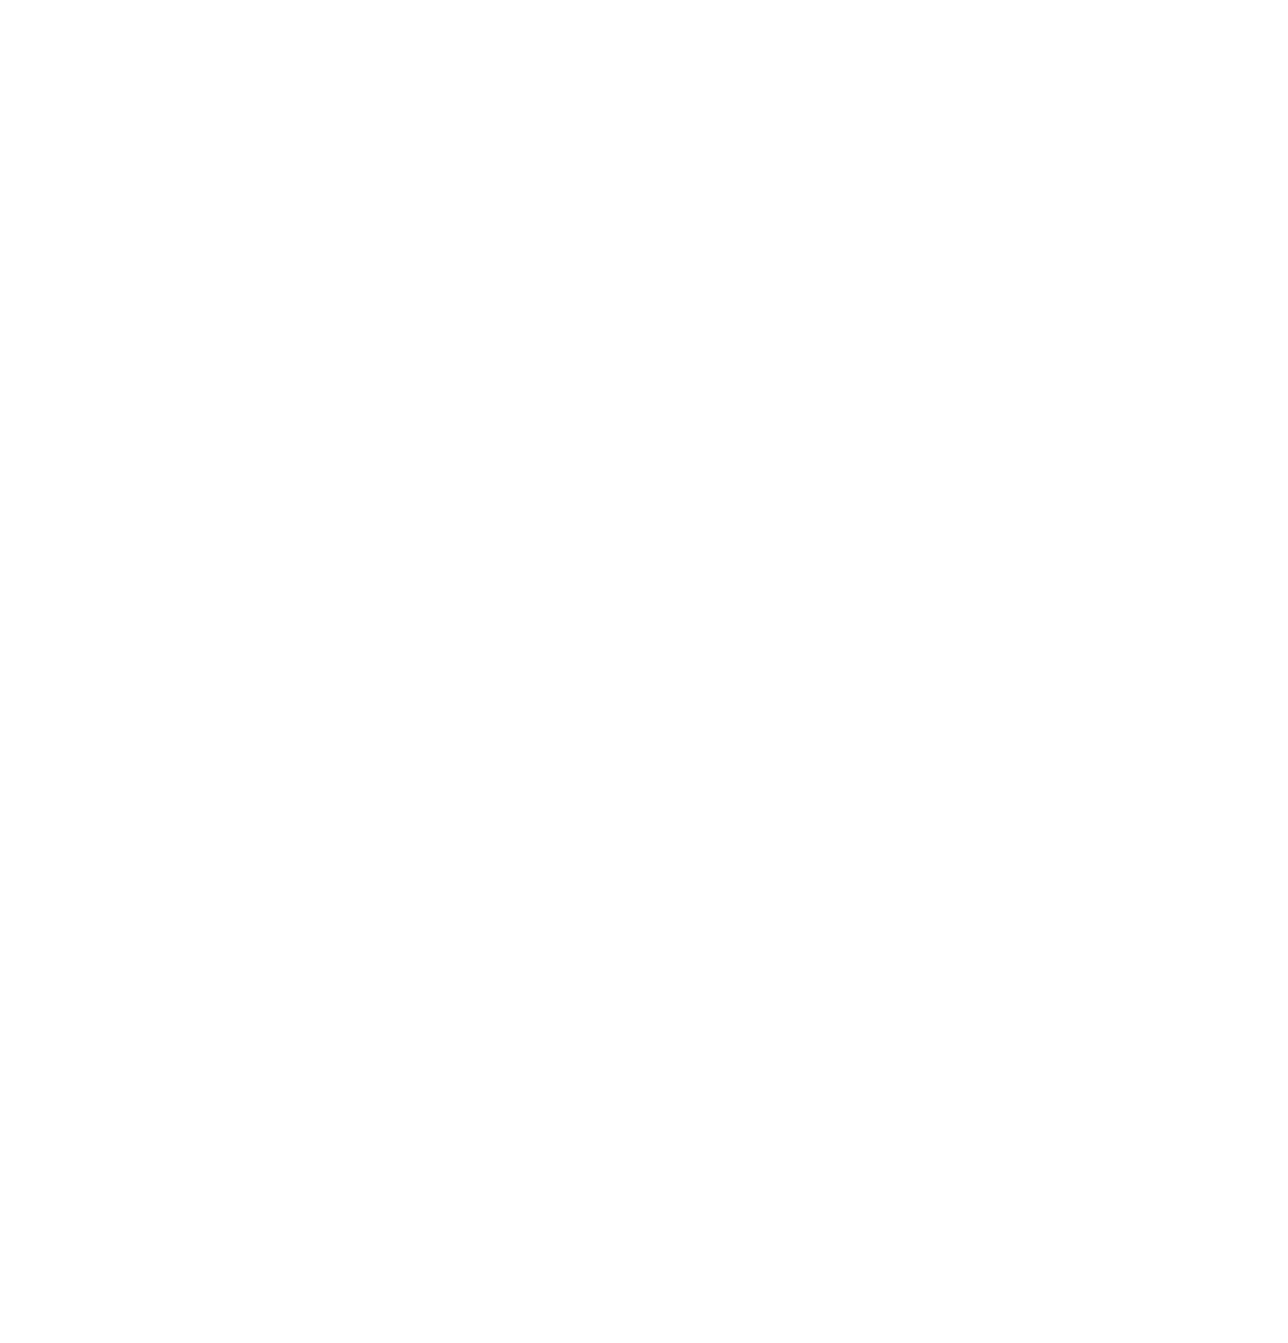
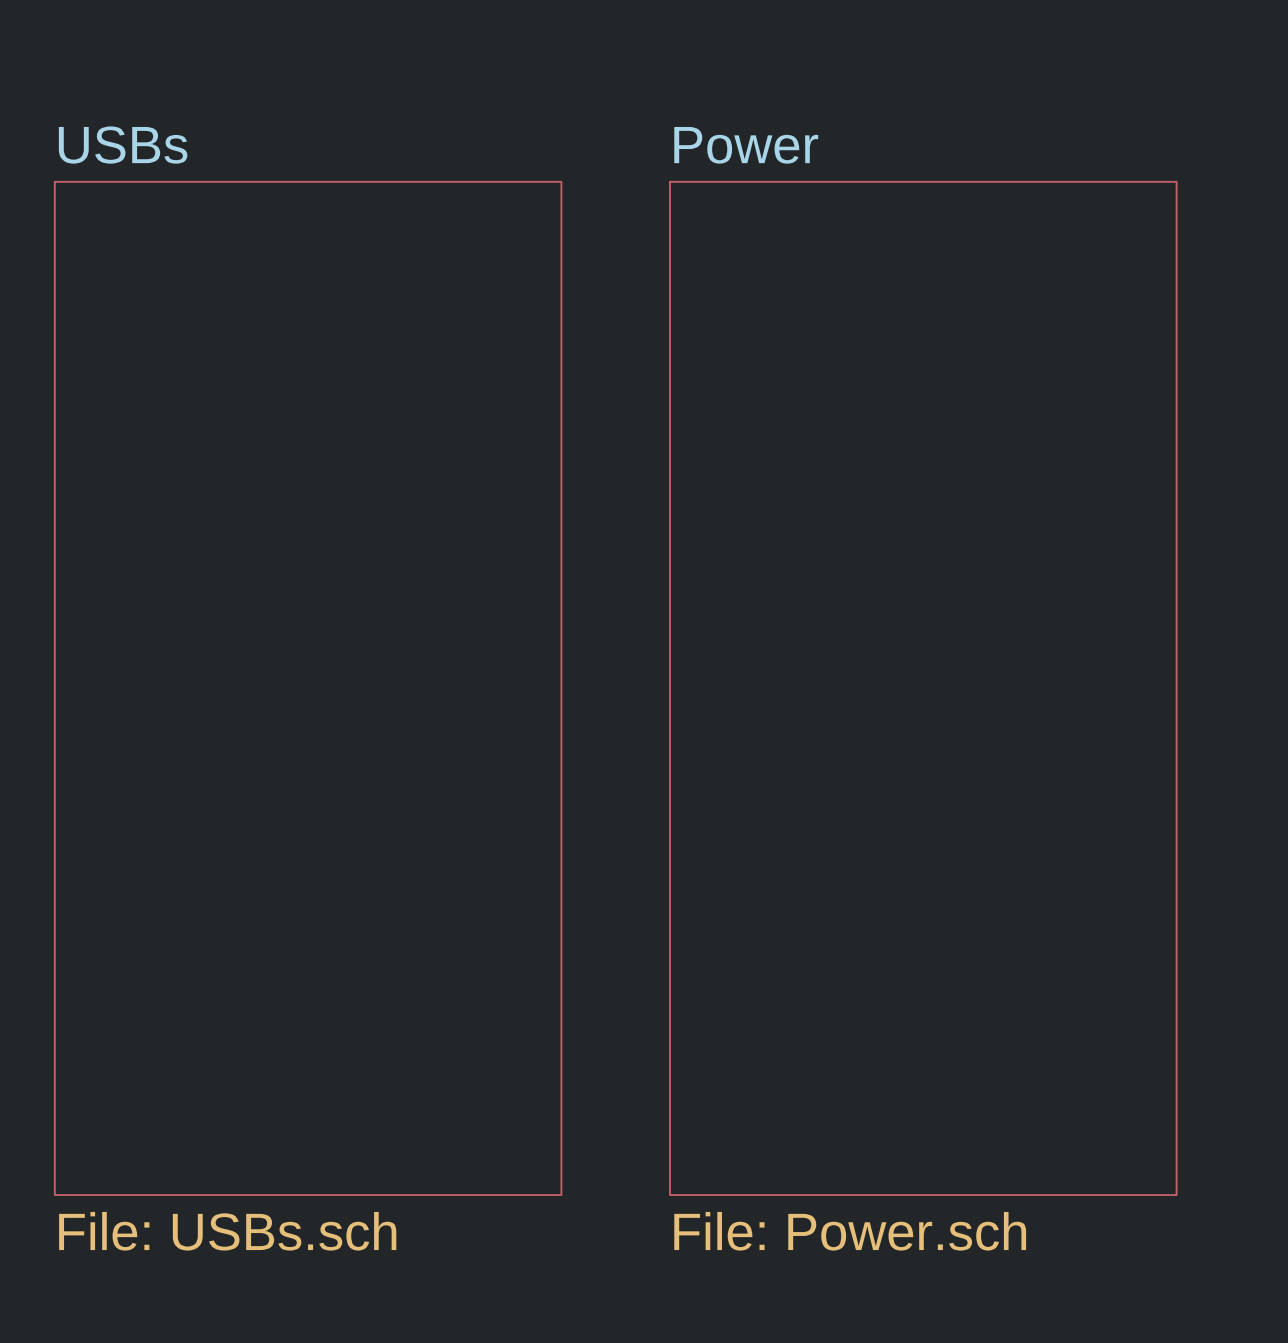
sheet USBs: none -> File: USBs.sch (308, 688)
sheet Power: none -> File: Power.sch (923, 688)

